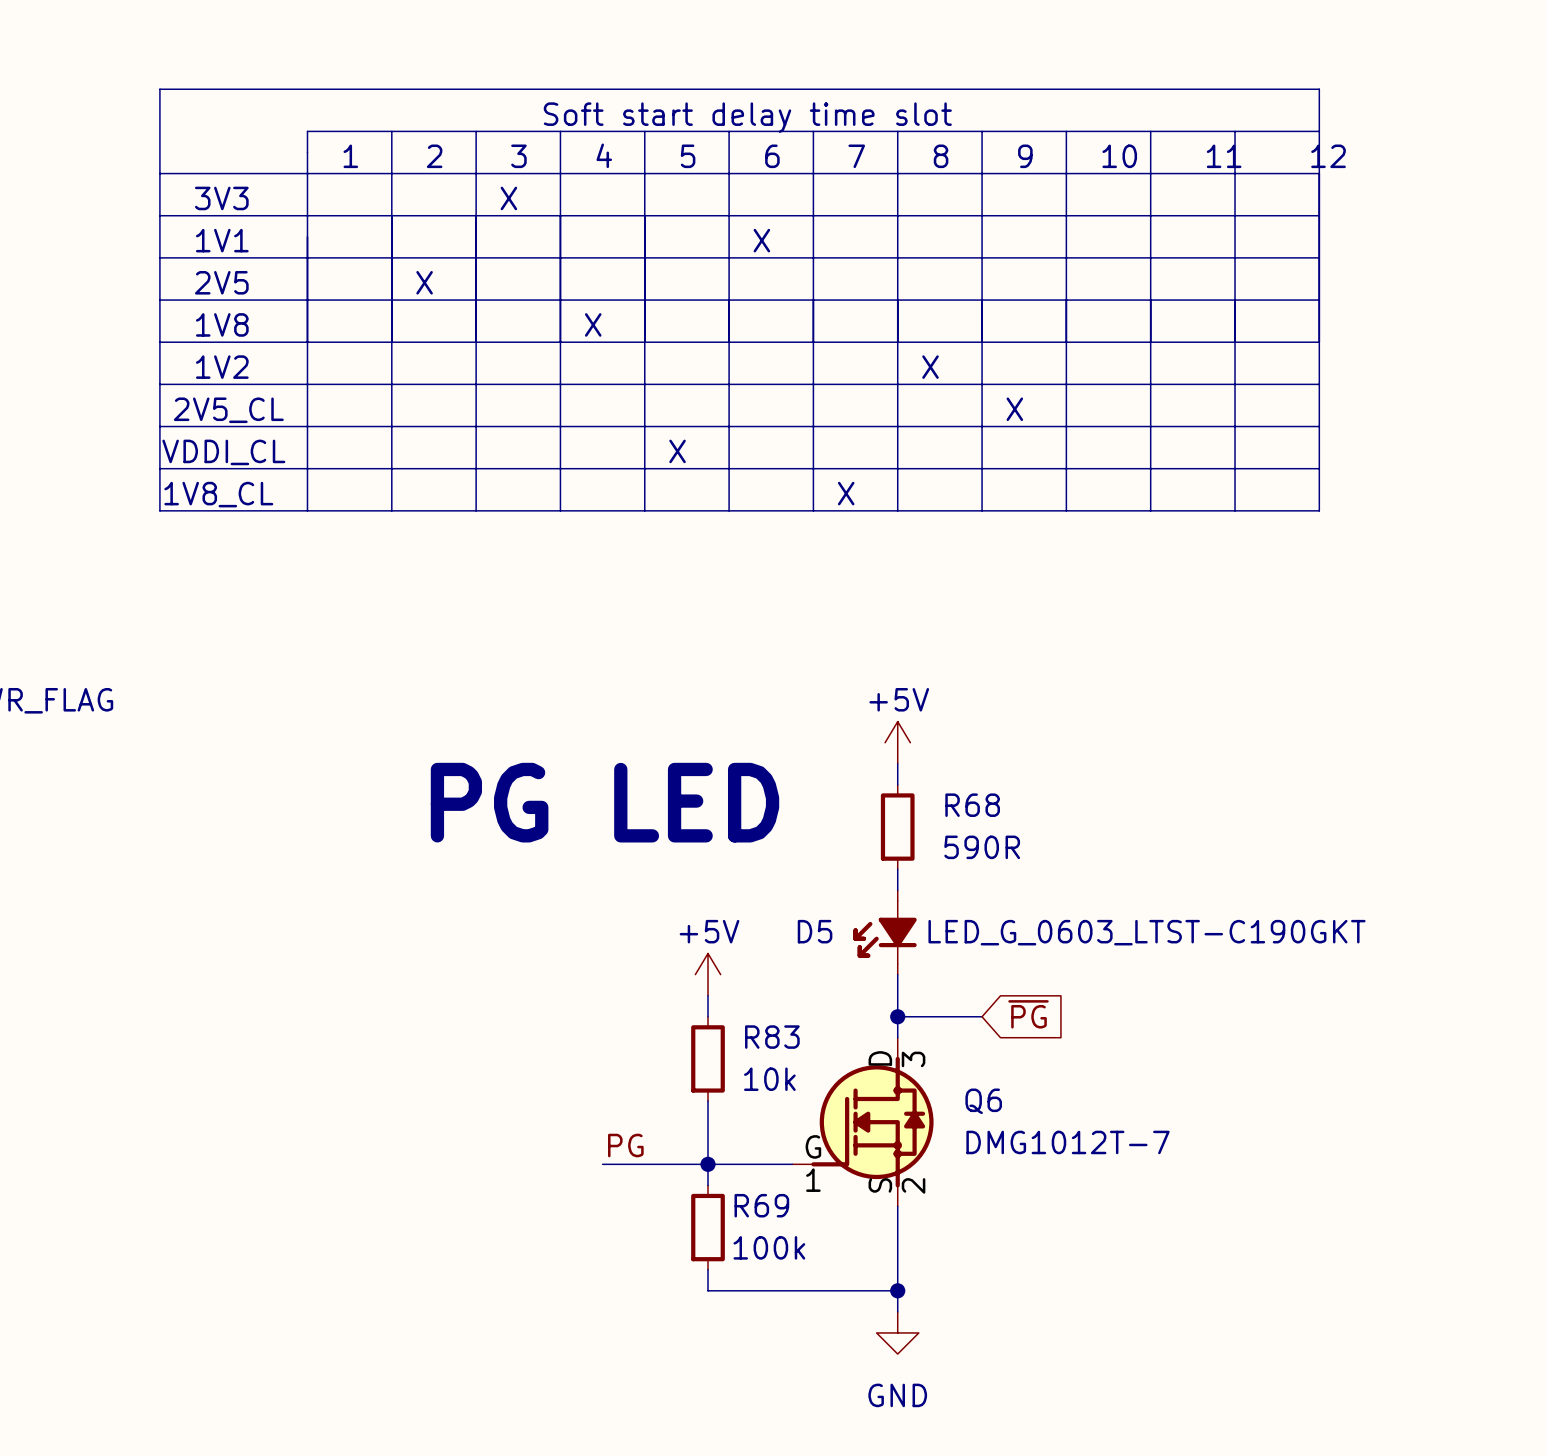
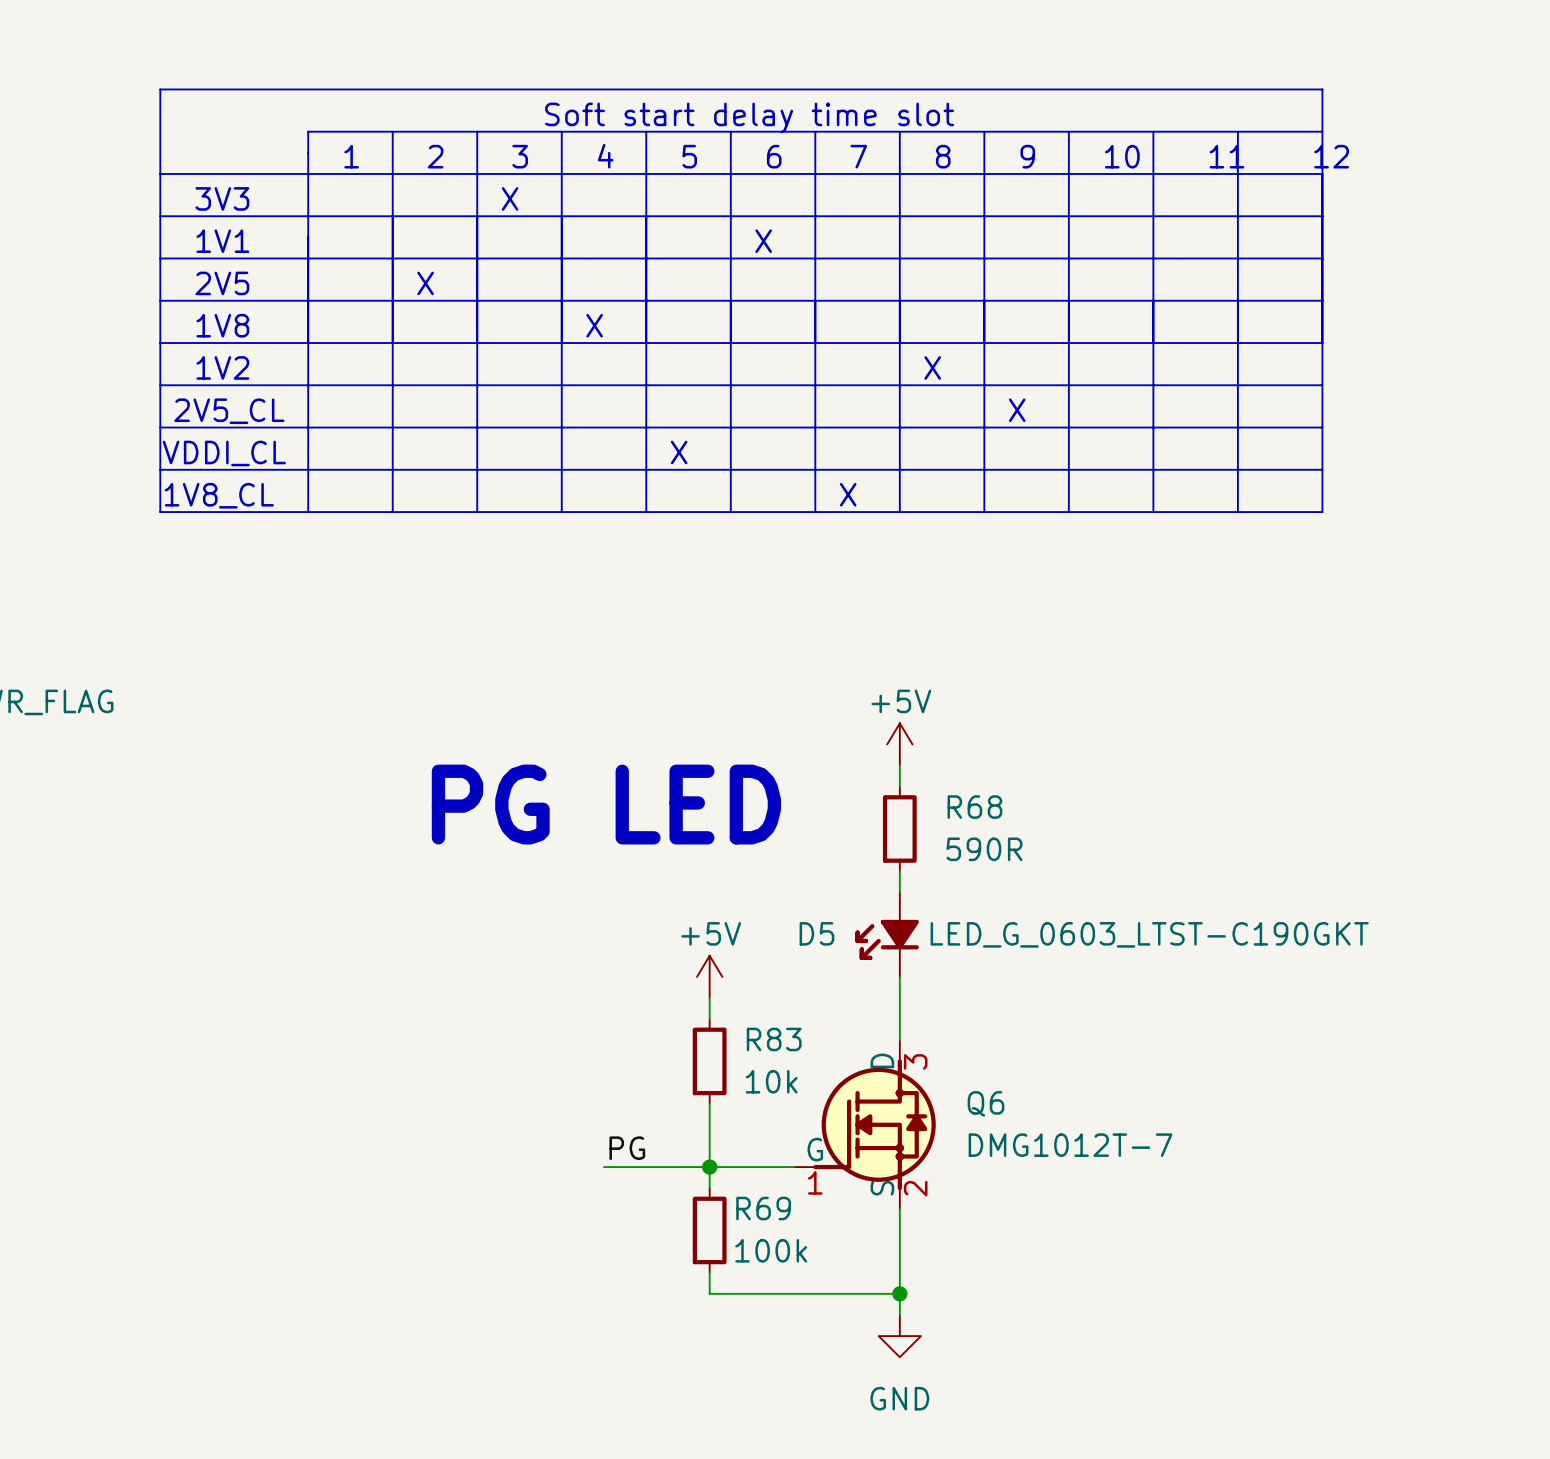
global label: ~{PG} (1028, 1014) -> none
wire: (897, 1016) (982, 1016) -> none
junction: (897, 1016) -> none

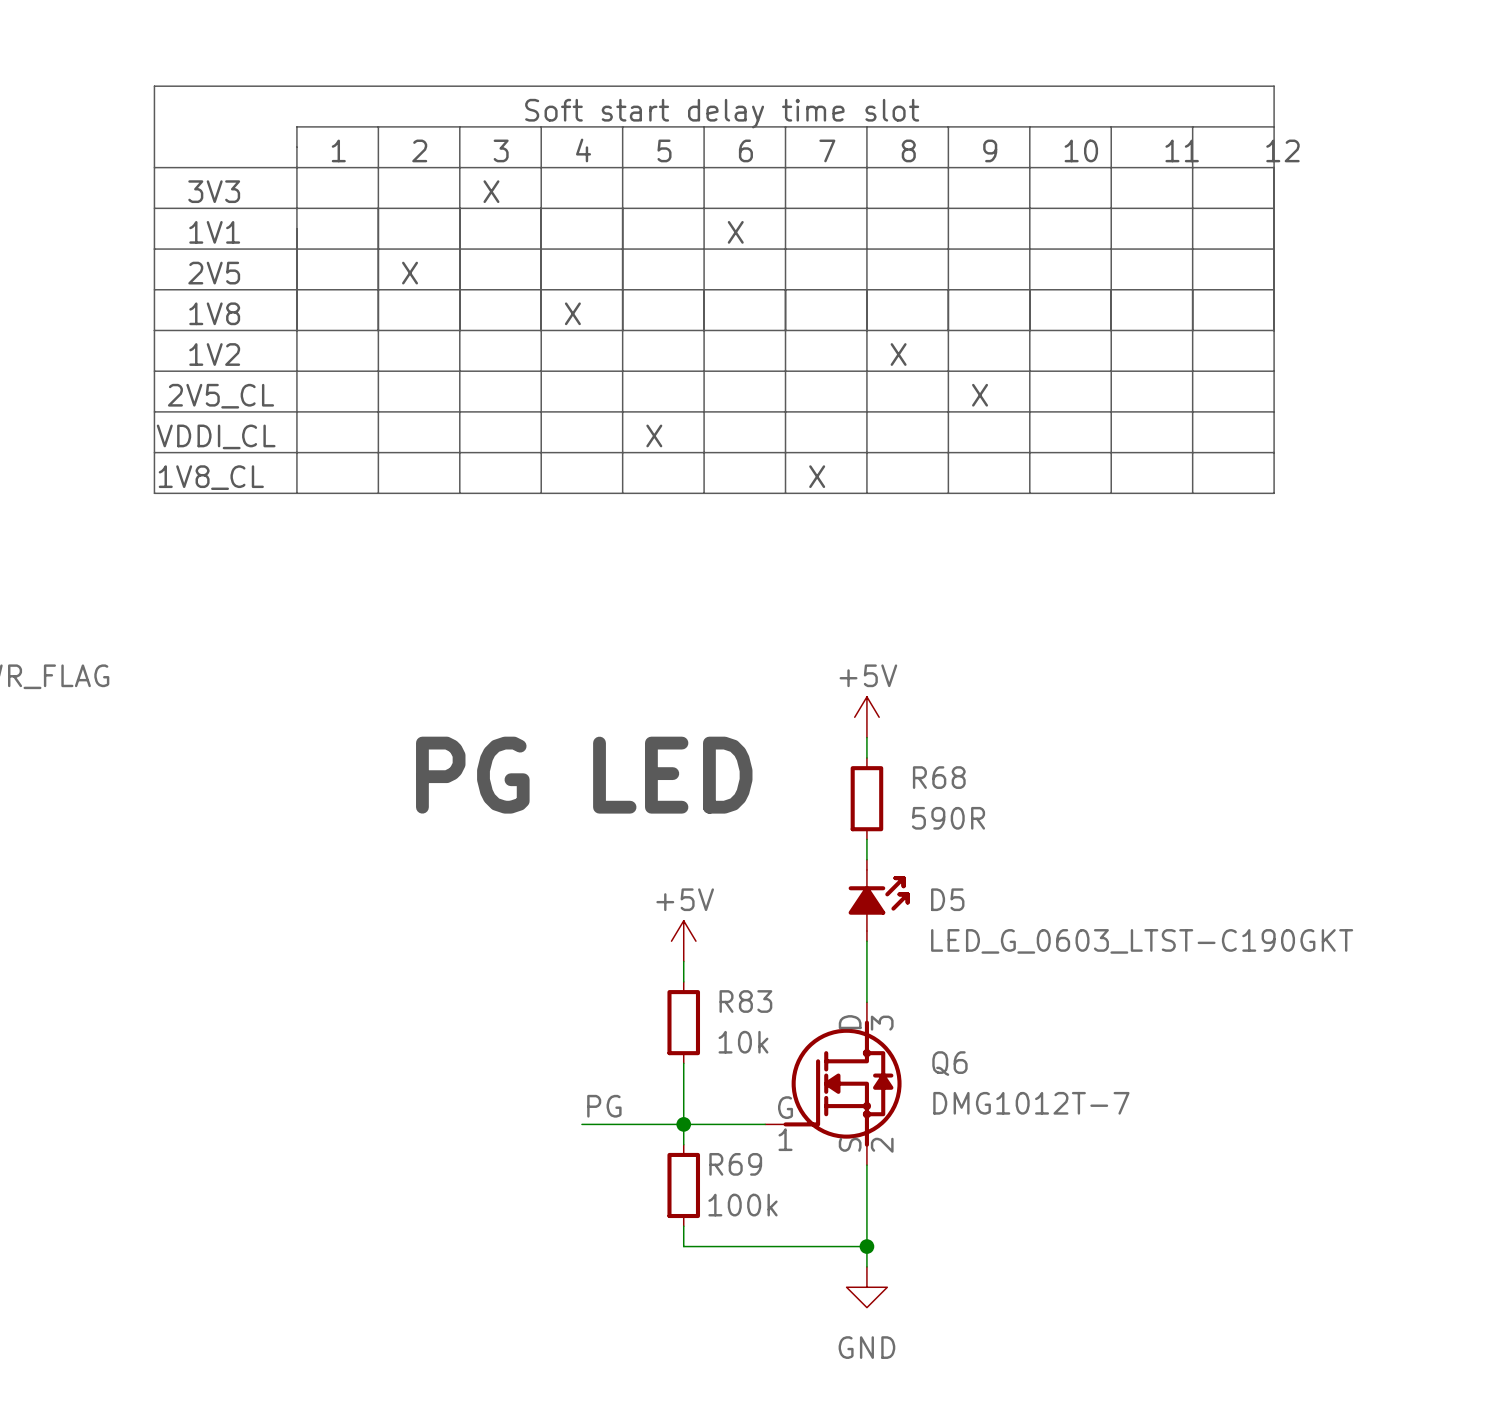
D5 rotation: 0° (887, 934) -> 180° (879, 900)
D5 value position: LED_G_0603_LTST-C190GKT (1149, 934) -> LED_G_0603_LTST-C190GKT (1142, 941)

